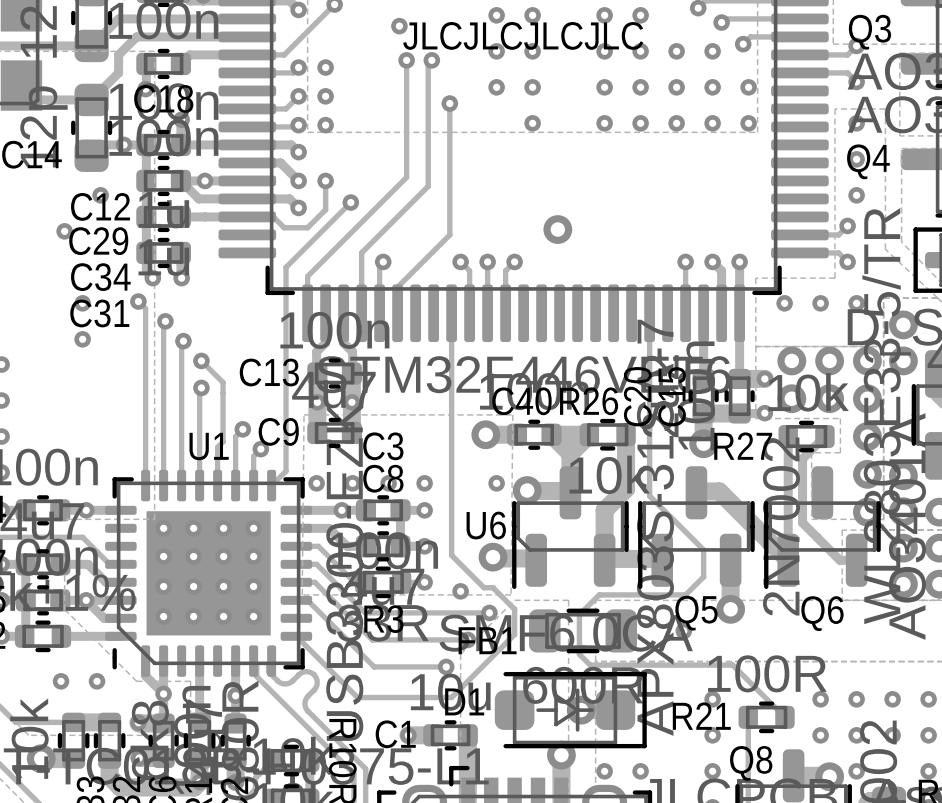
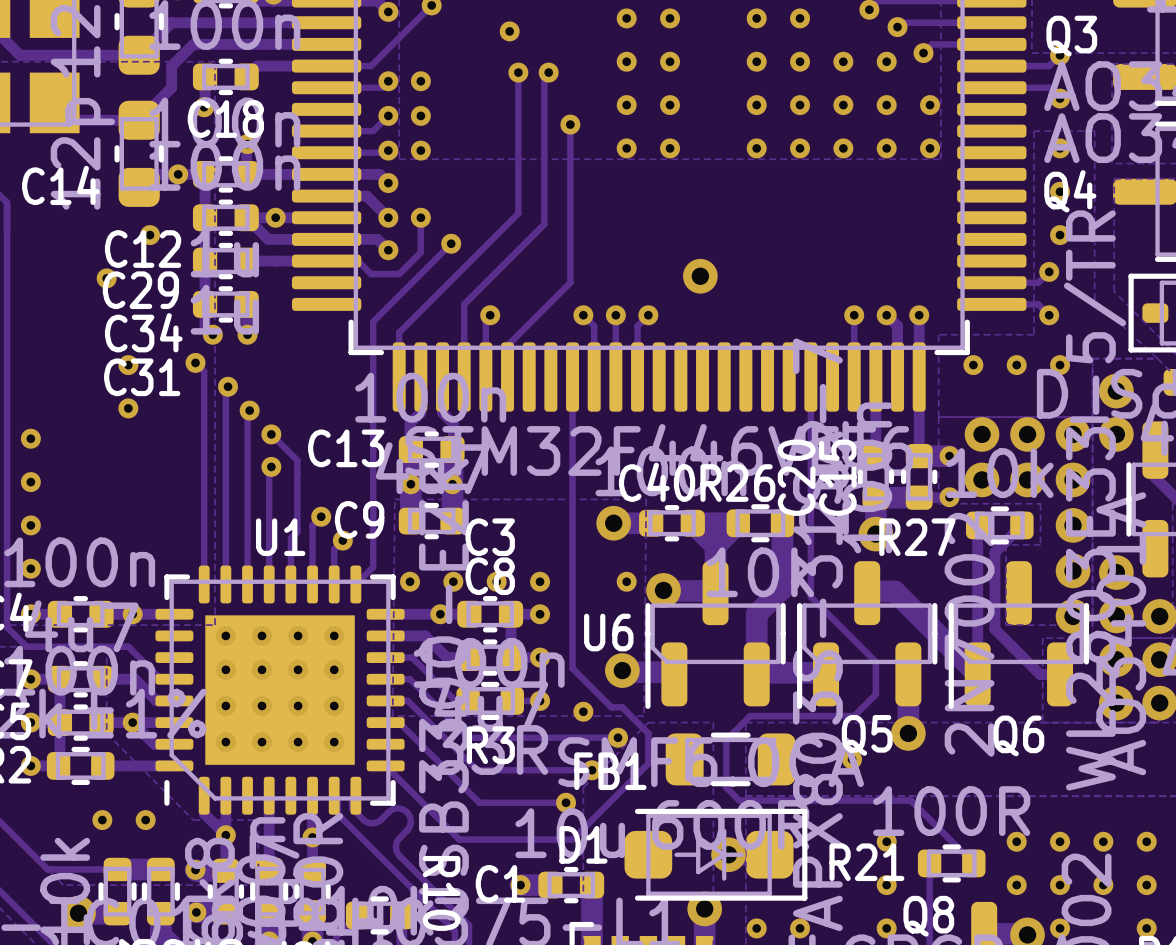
text: JLCJLCJLCJLC (523, 35) -> none
via: none -> (626, 148)

